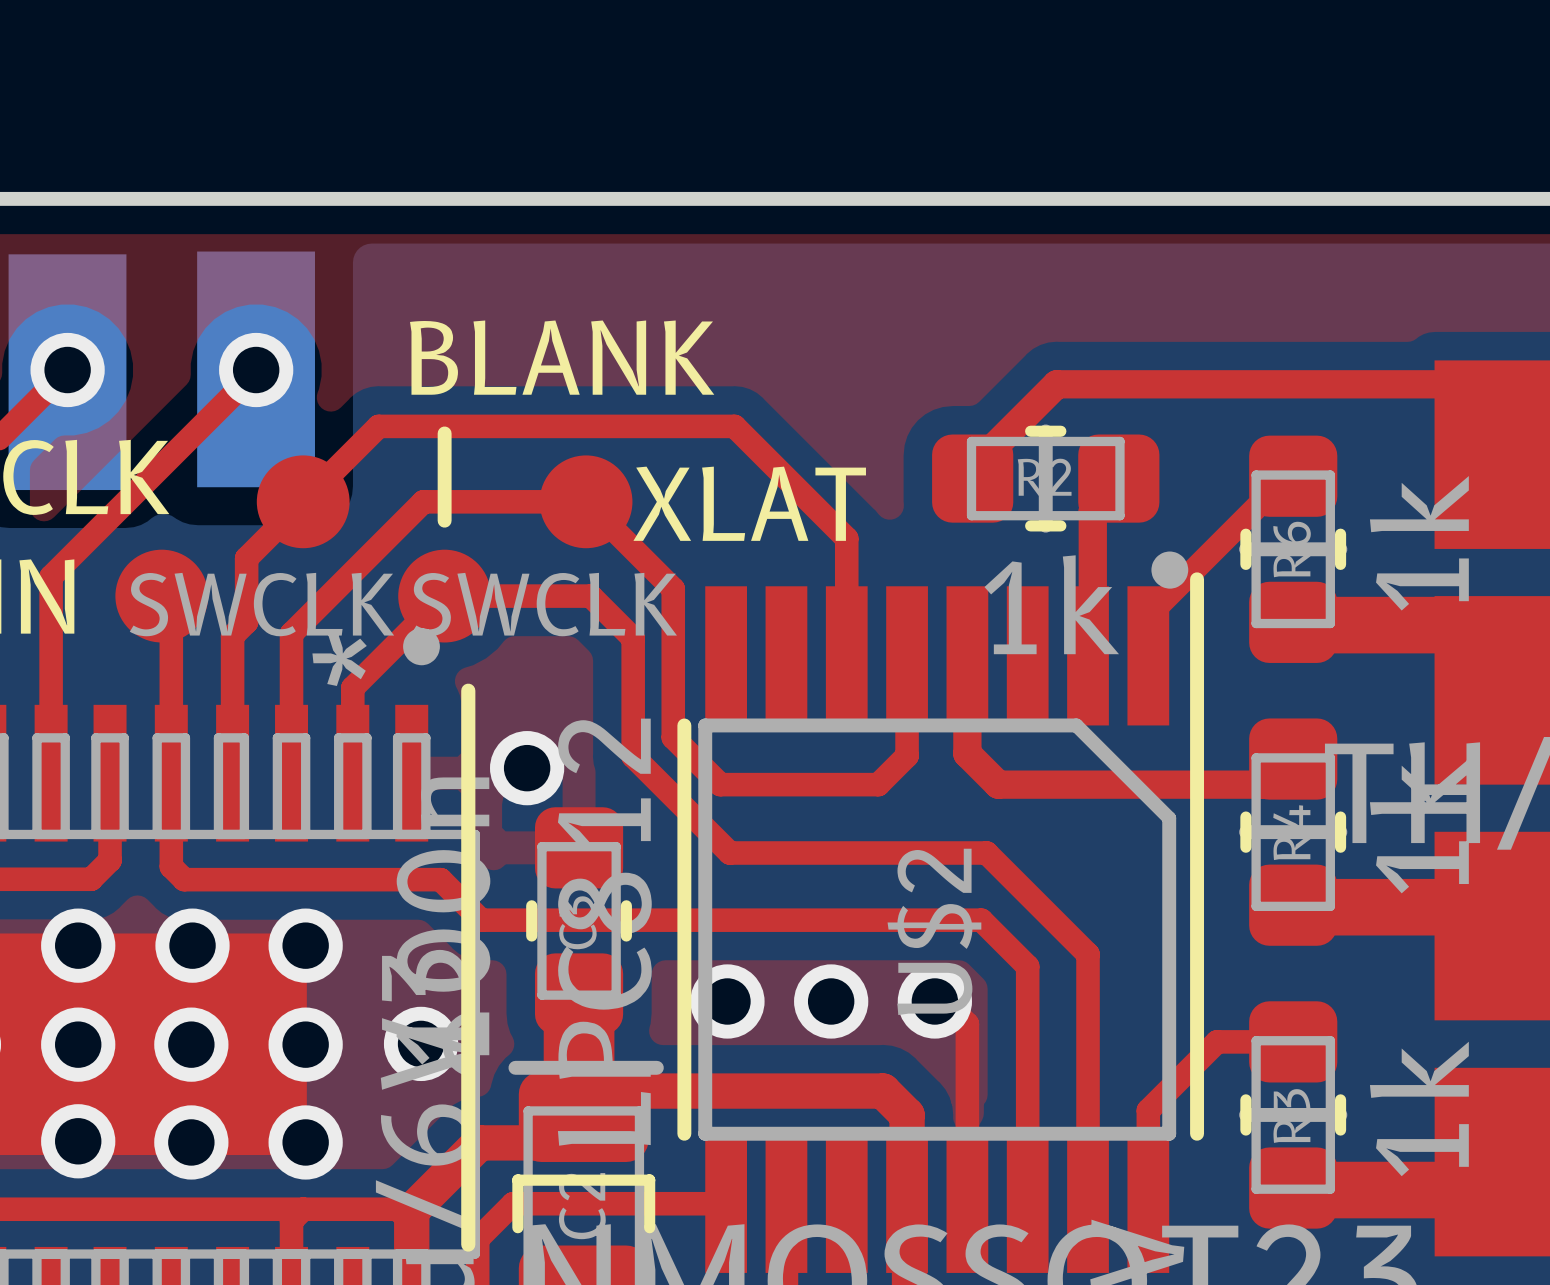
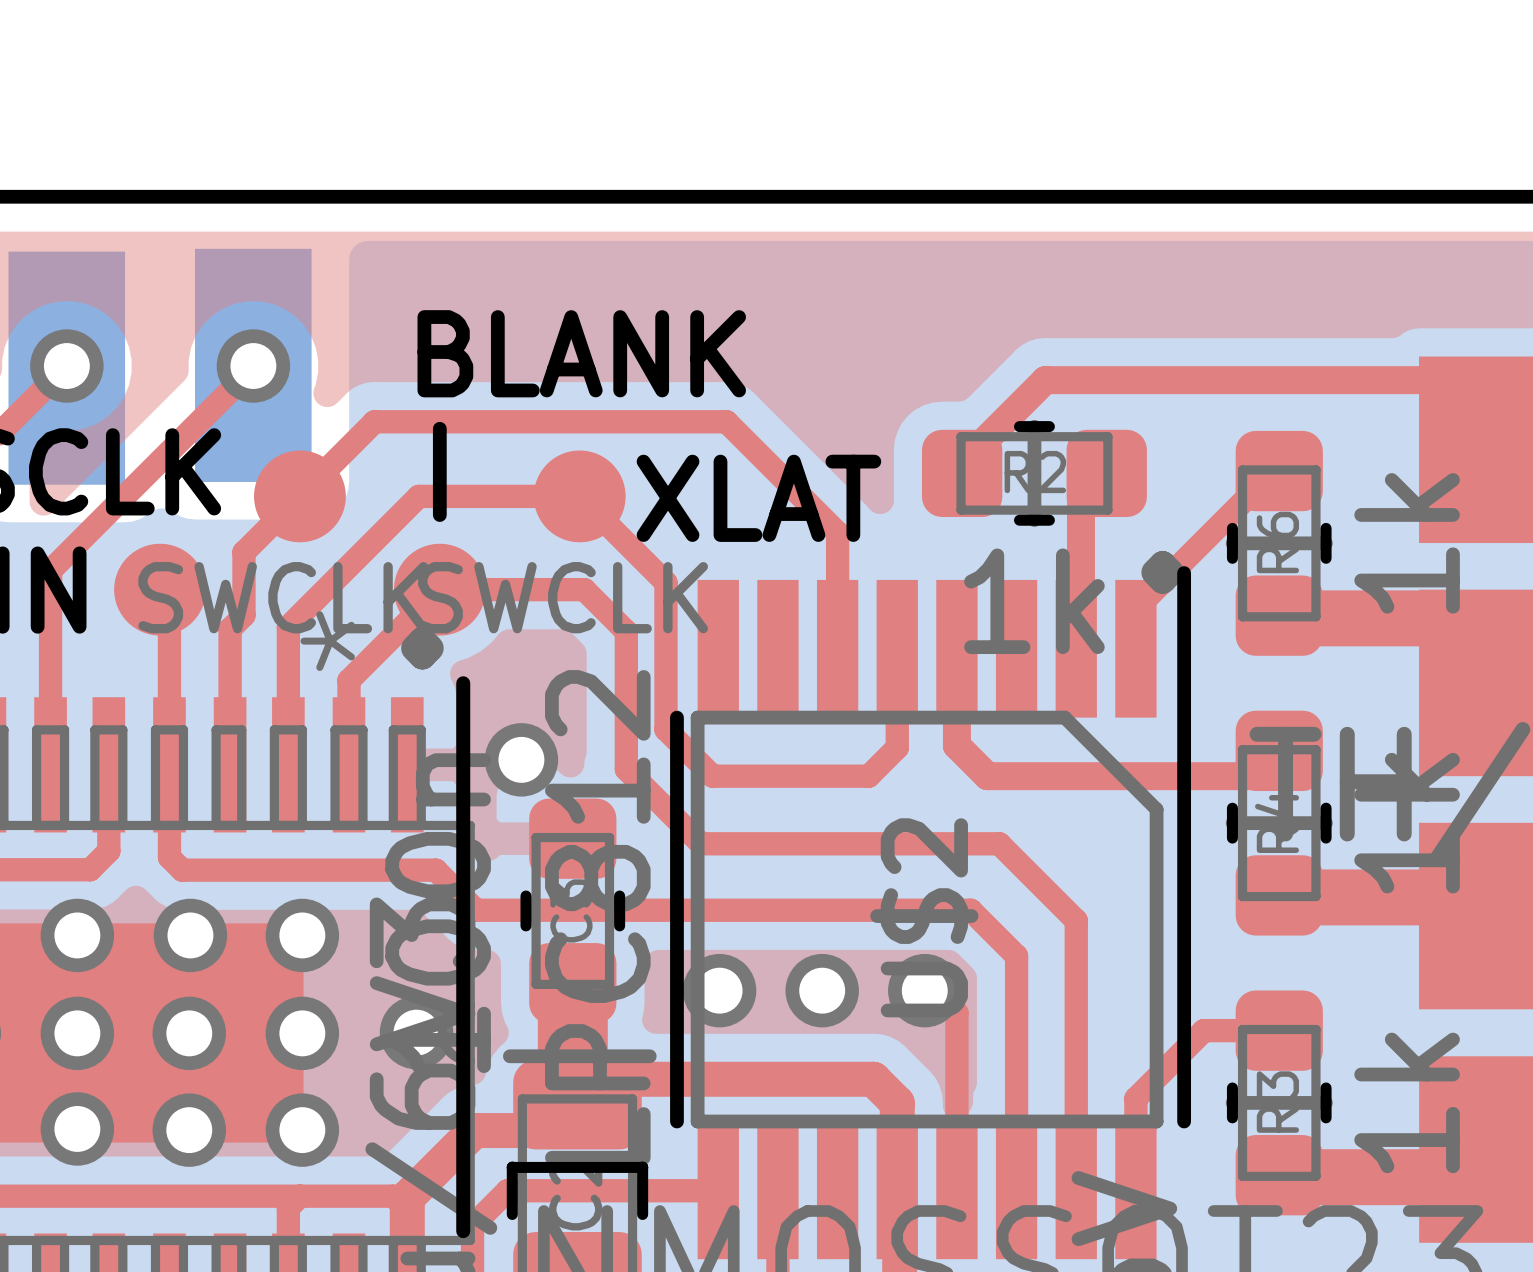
top track: (633, 756) (729, 853) -> (626, 748) (626, 769) (700, 843) (721, 843)
top track: (986, 853) (1088, 954) -> (976, 843) (999, 843) (1076, 920) (1076, 943)

